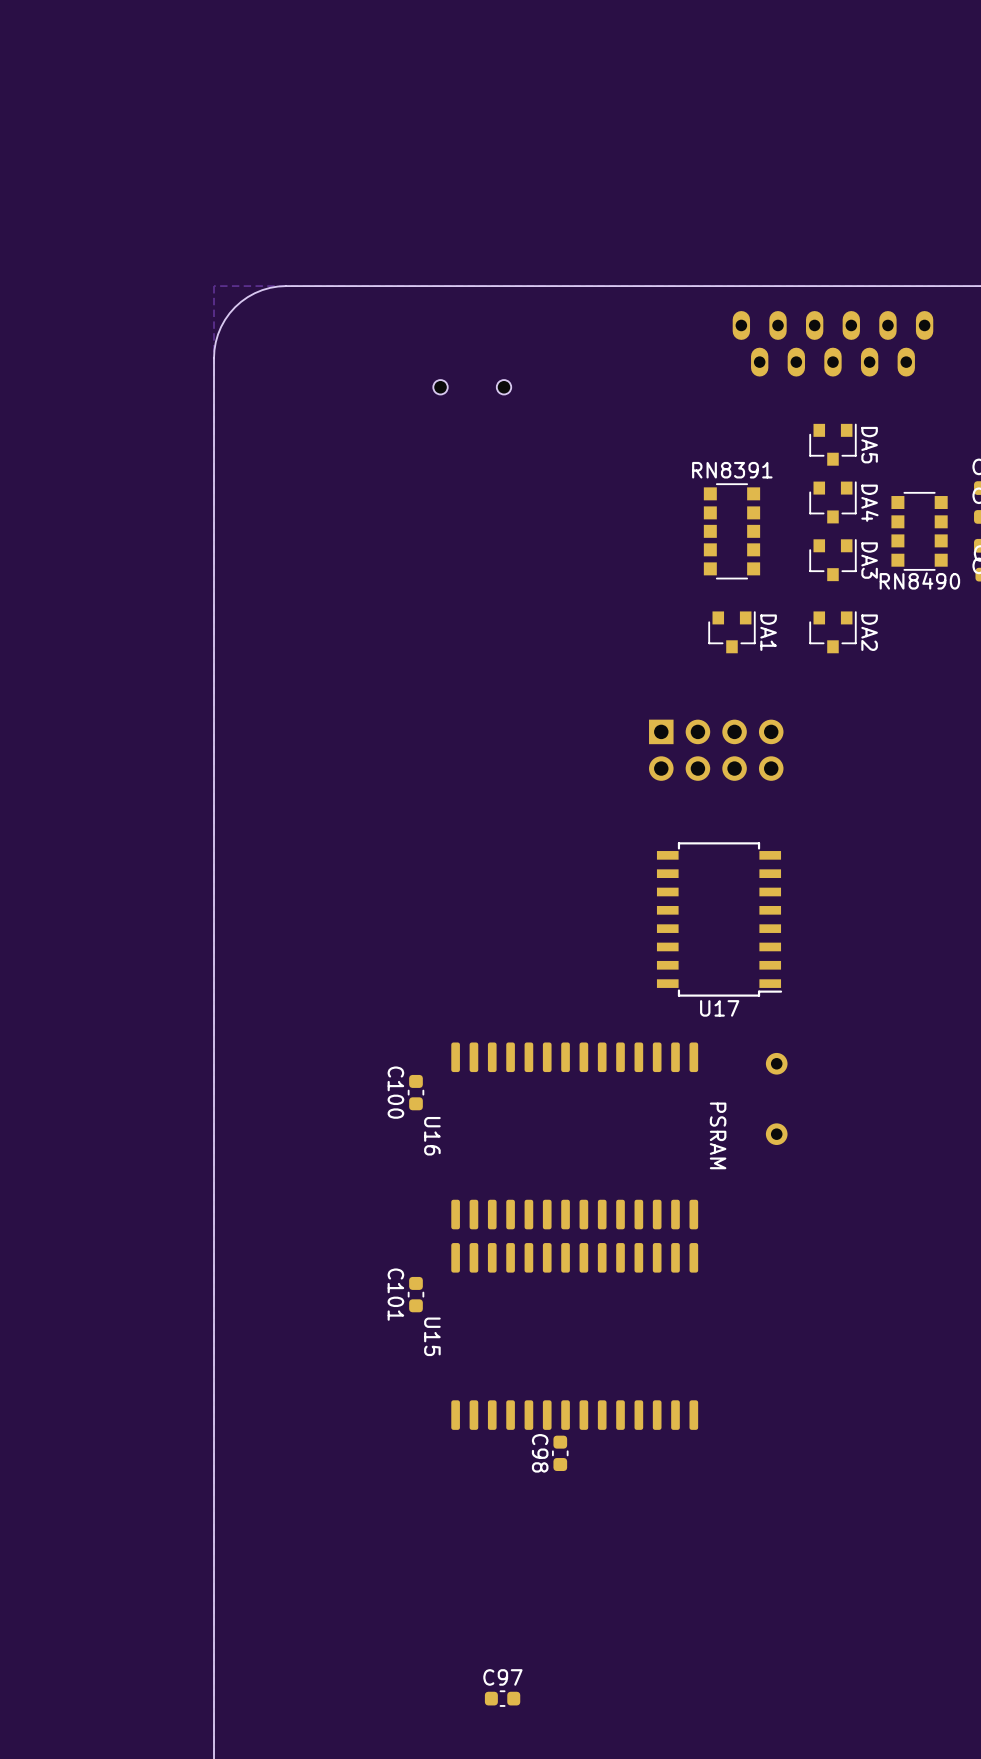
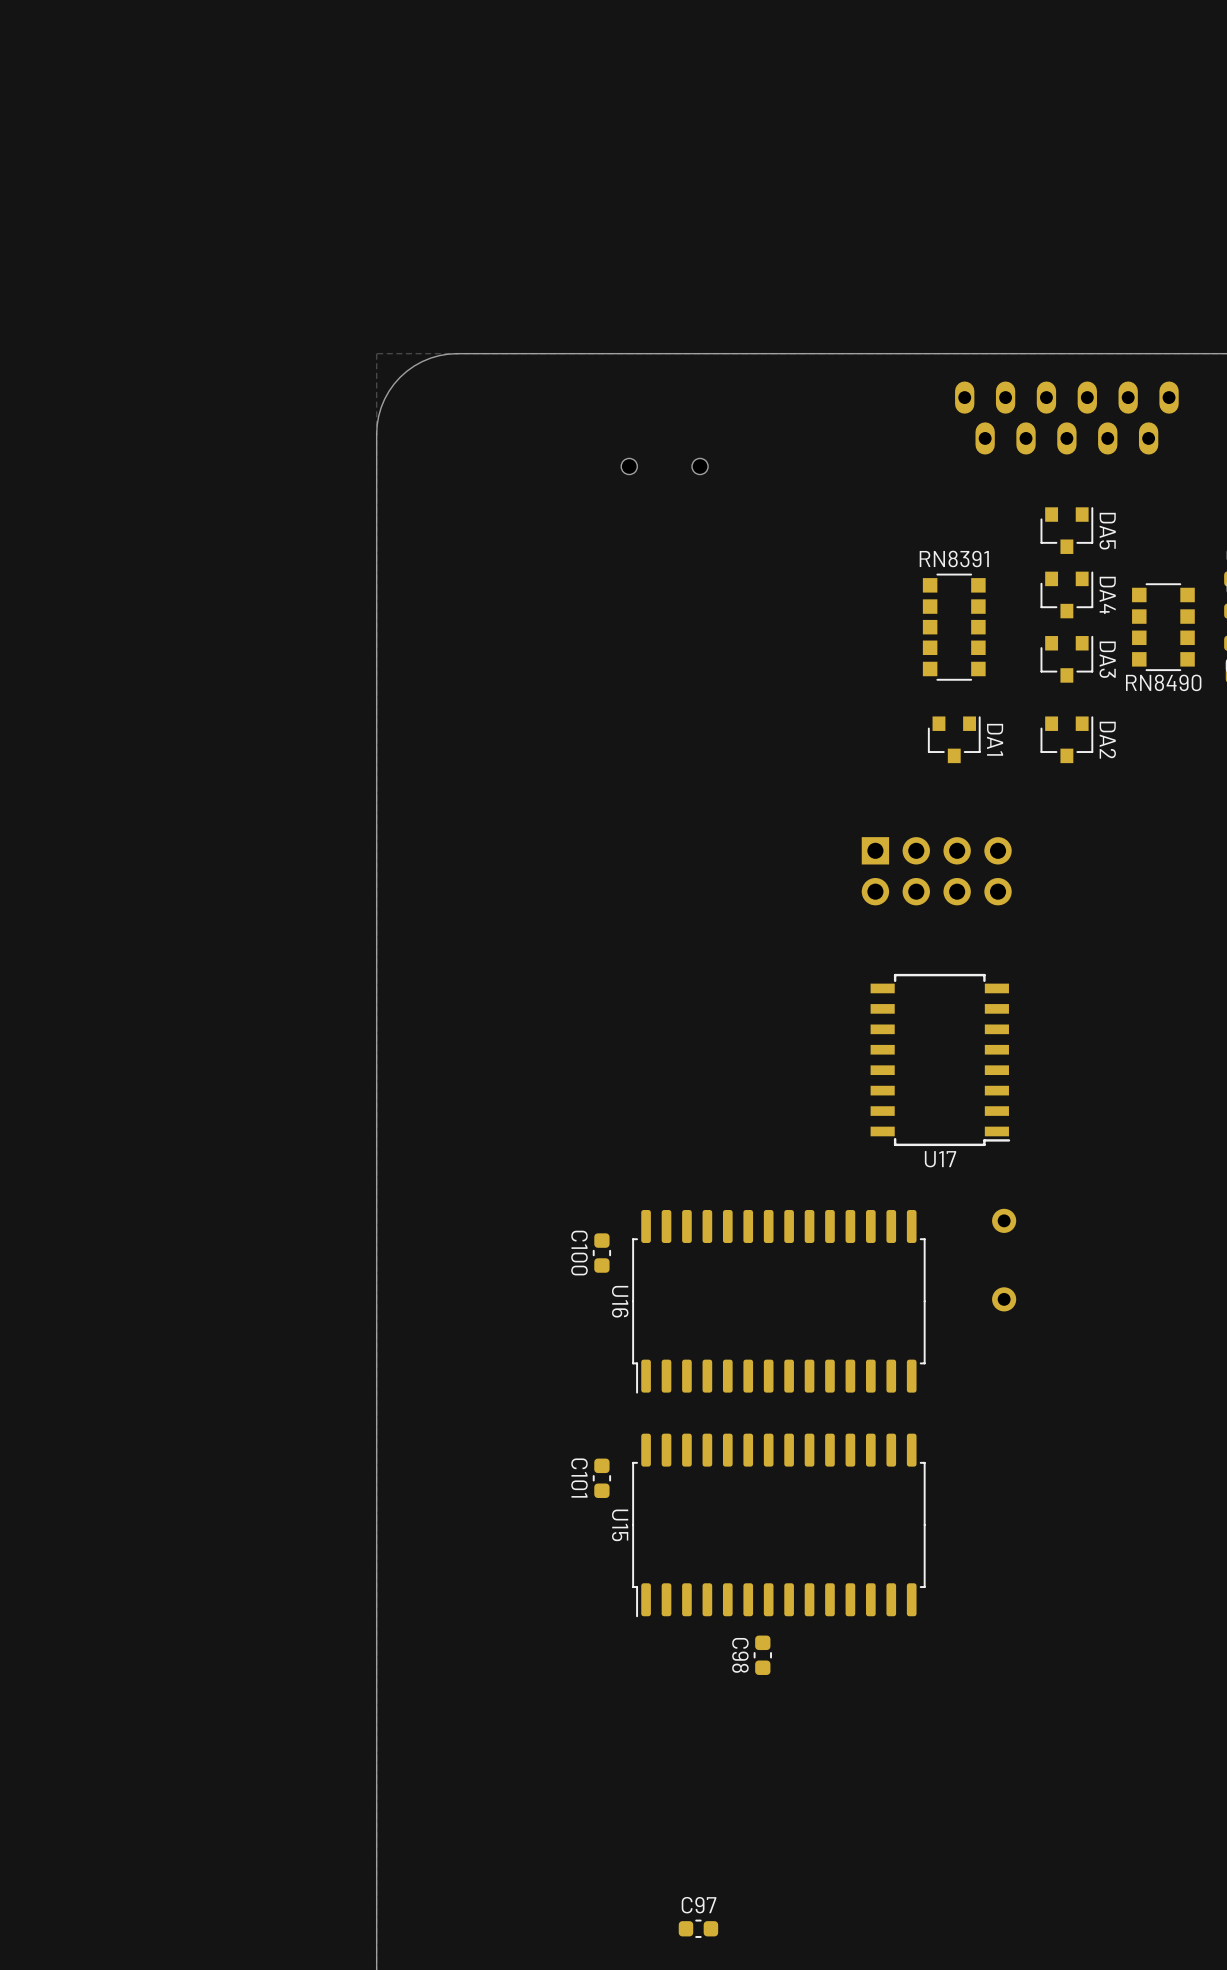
U16 footprint: [451, 1042, 699, 1230] -> [632, 1210, 926, 1394]
U16 value: PSRAM (718, 1135) -> none
U15 footprint: [451, 1243, 699, 1430] -> [632, 1433, 926, 1618]

